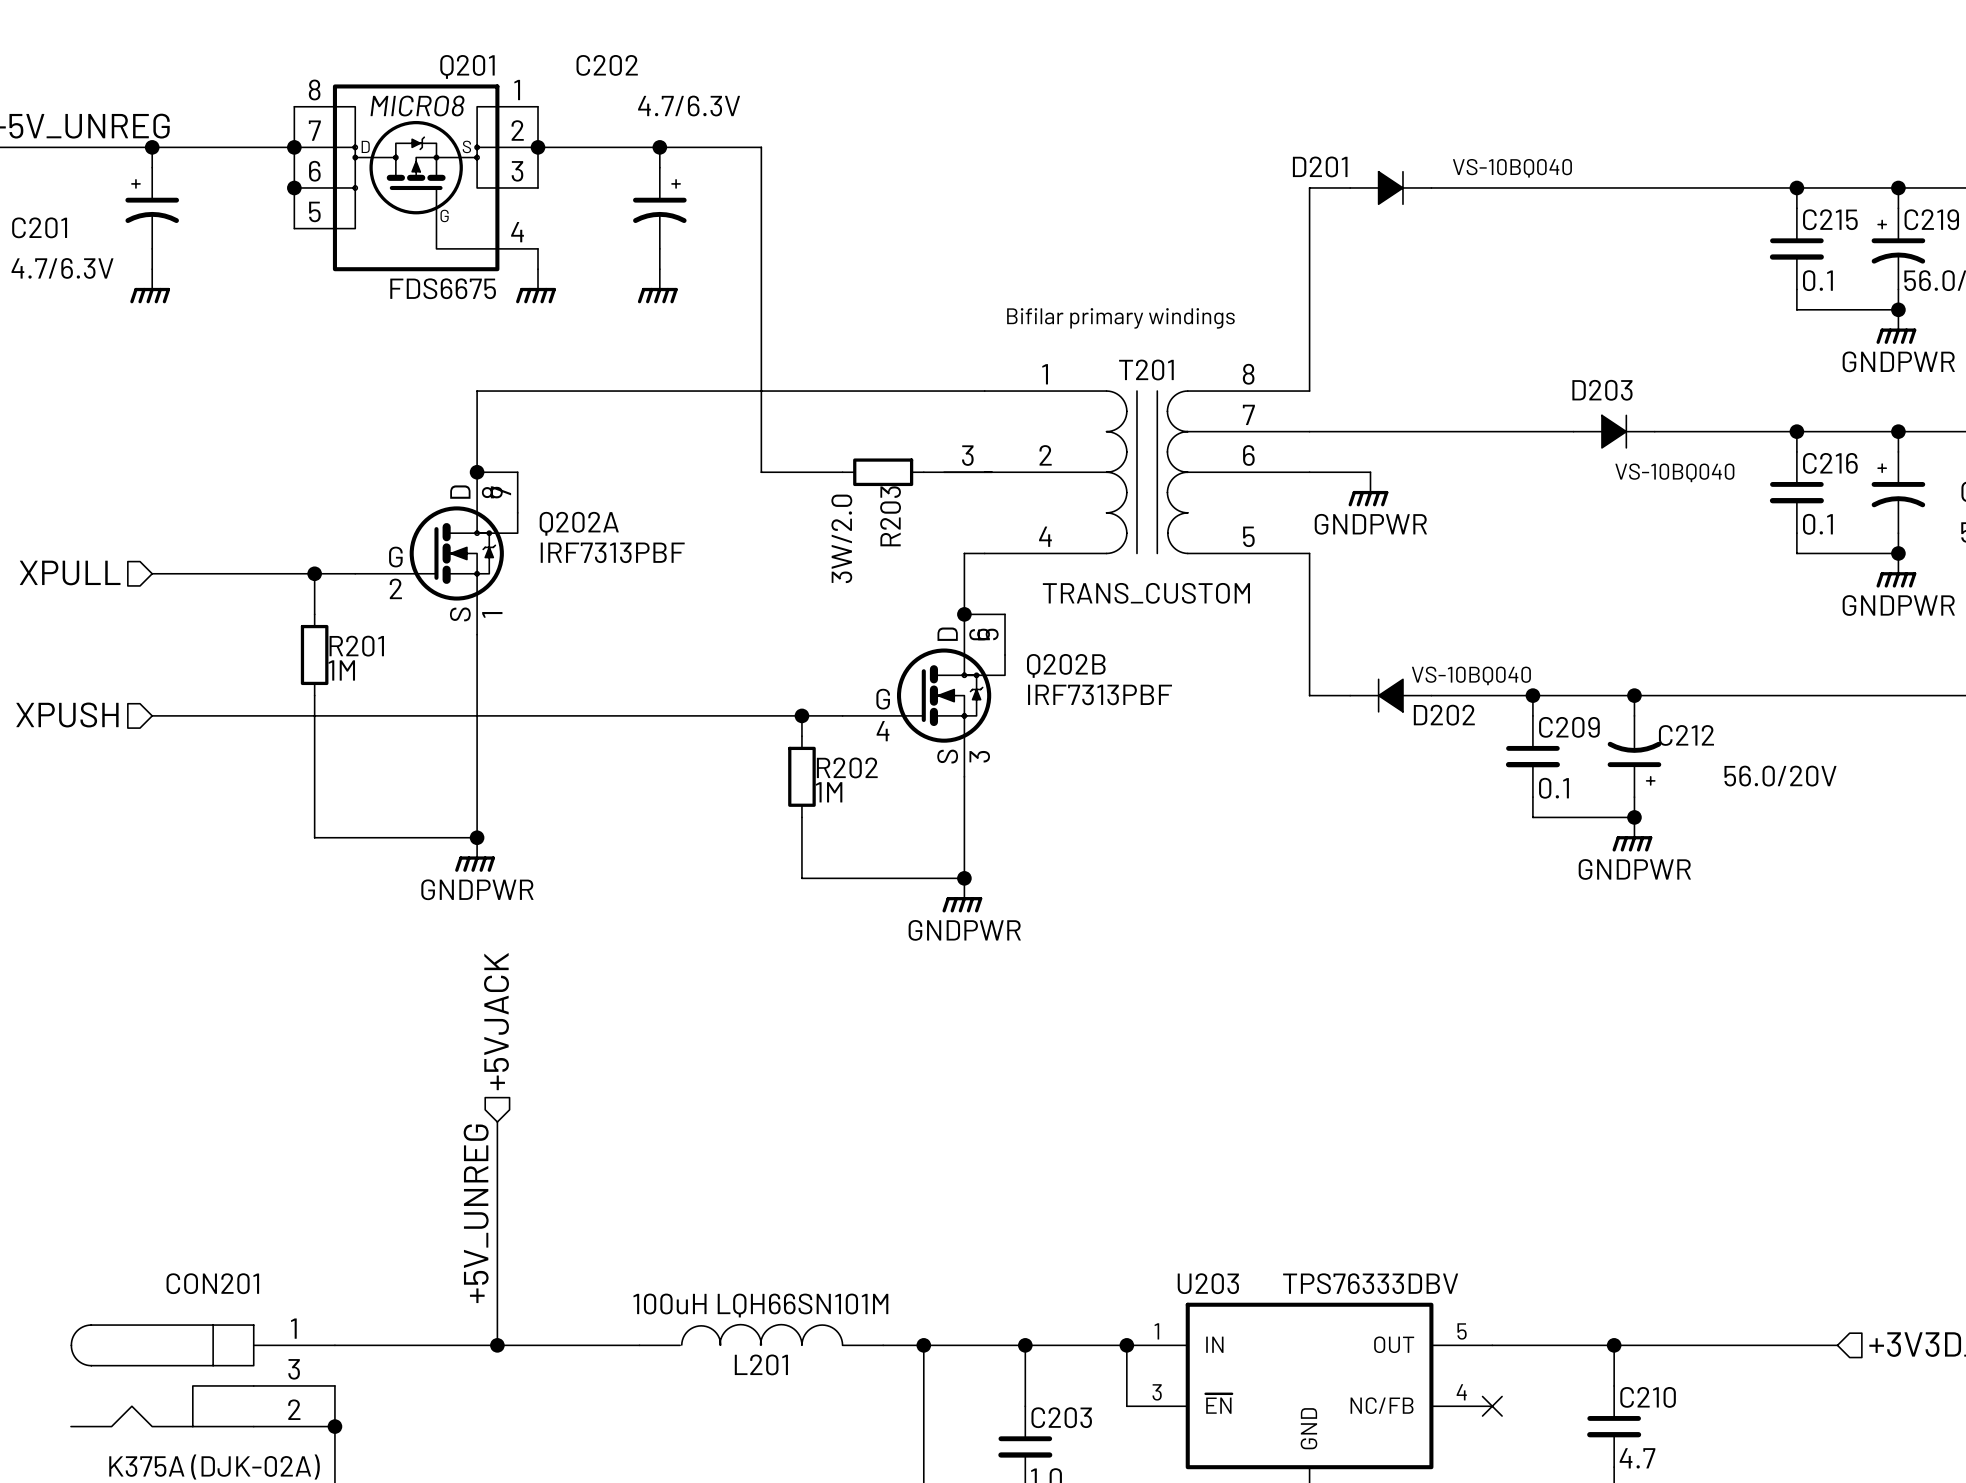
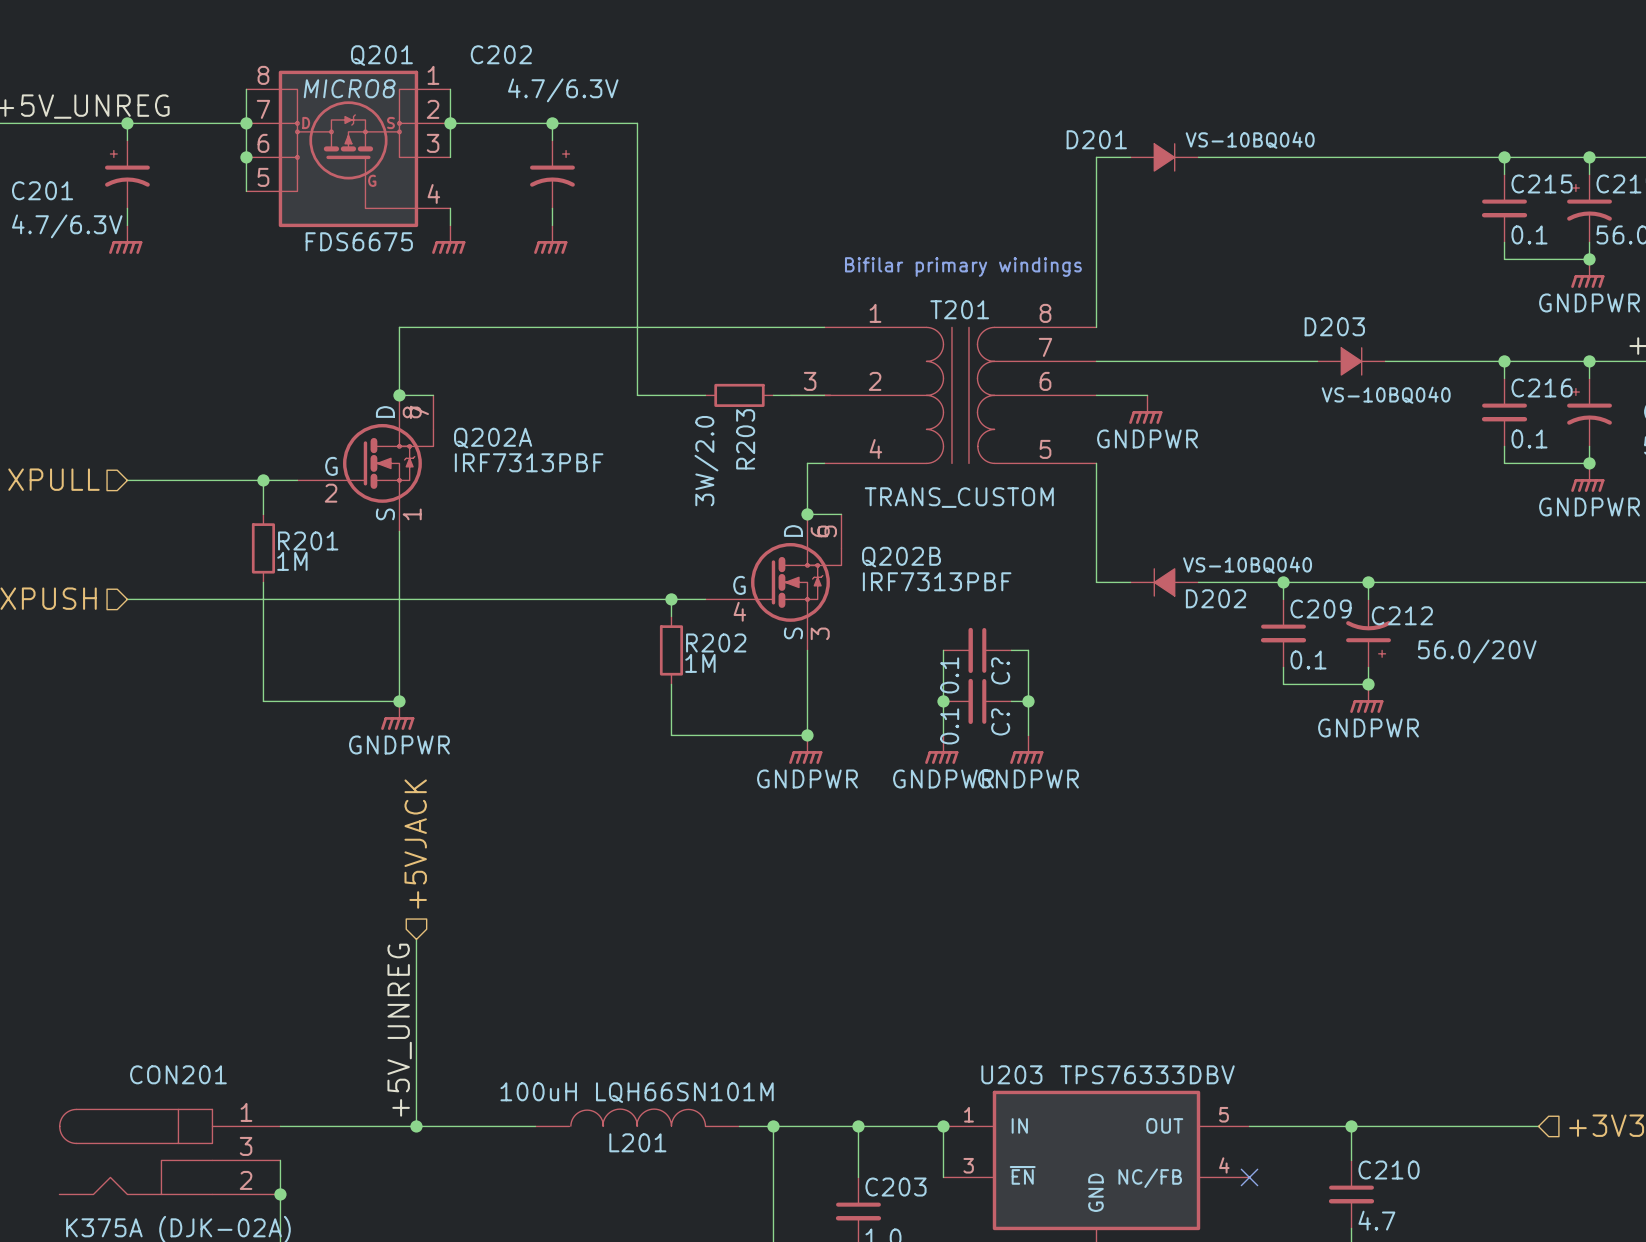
wire: none -> (943, 650) (943, 735)
C?: none -> 0.1 (977, 650)
wire: none -> (1011, 650) (1028, 650) (1028, 735)
junction: none -> (943, 701)
C?: none -> 0.1 (977, 701)
wire: none -> (1011, 701) (1028, 701)
junction: none -> (1028, 701)
power symbol: none -> GNDPWR (941, 749)
power symbol: none -> GNDPWR (1026, 749)

